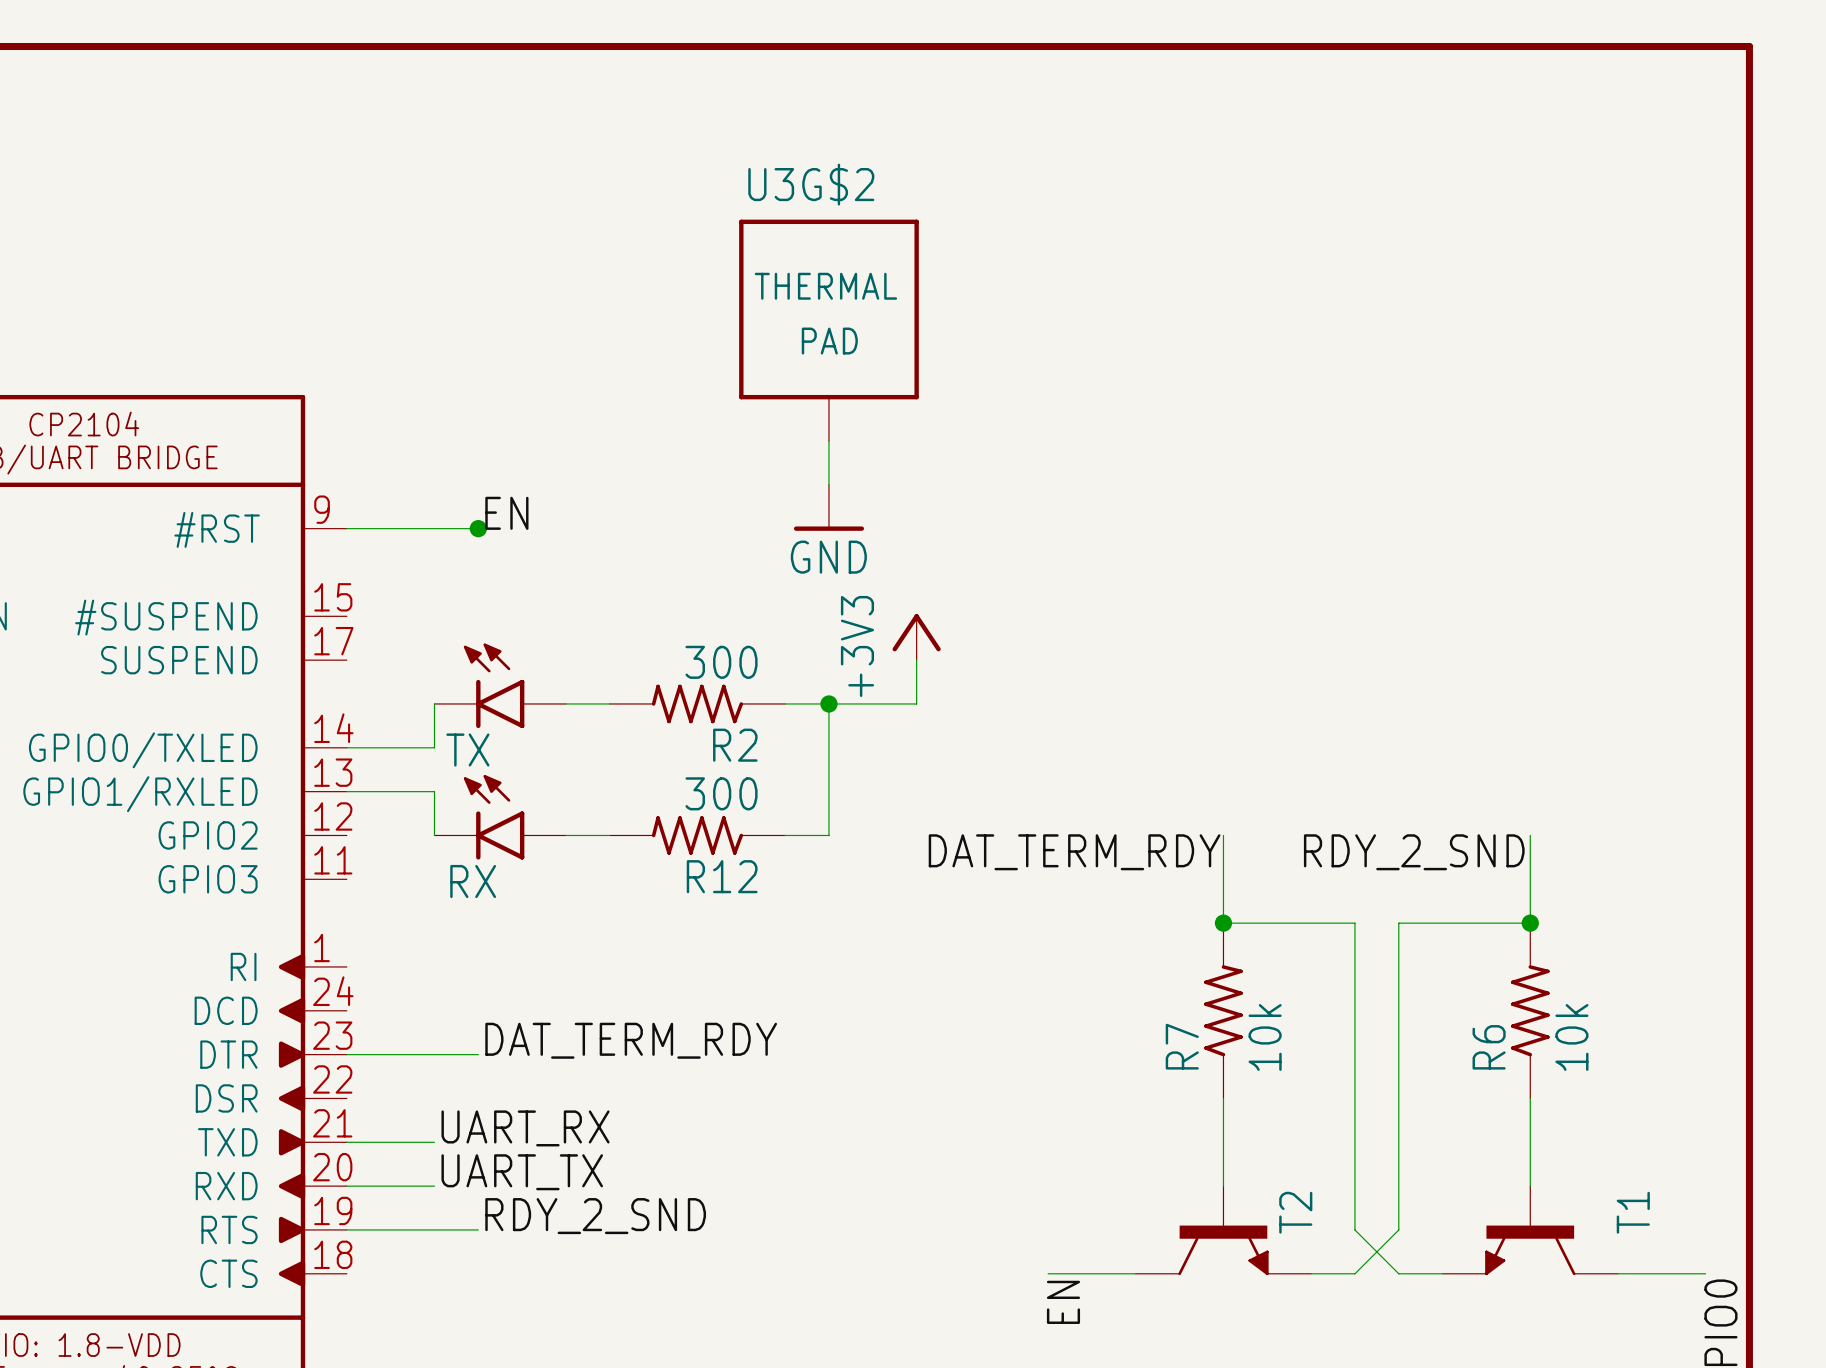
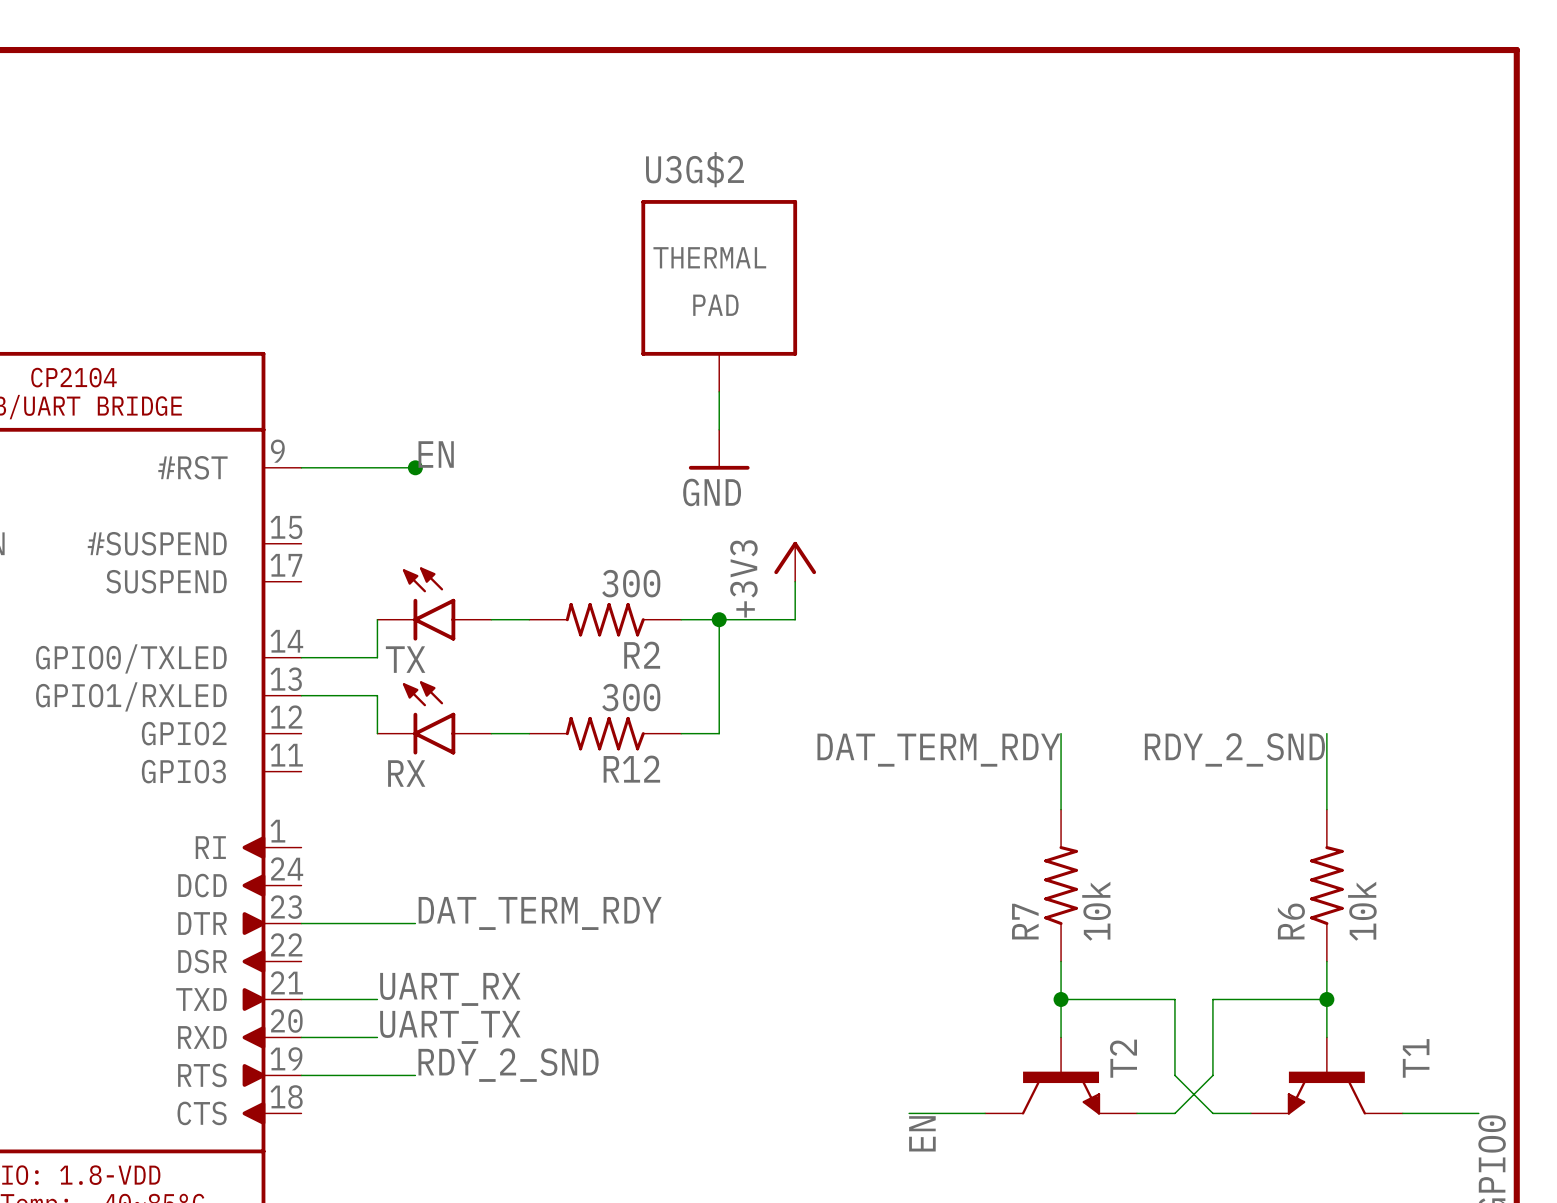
wire: (1223, 923) (1354, 923) (1354, 1142) -> (1061, 999) (1174, 999)
junction: (1223, 923) -> none
wire: (1530, 923) (1398, 923) (1398, 1142) -> (1326, 999) (1212, 999)
junction: (1530, 923) -> none
junction: none -> (1061, 999)
junction: none -> (1326, 999)

